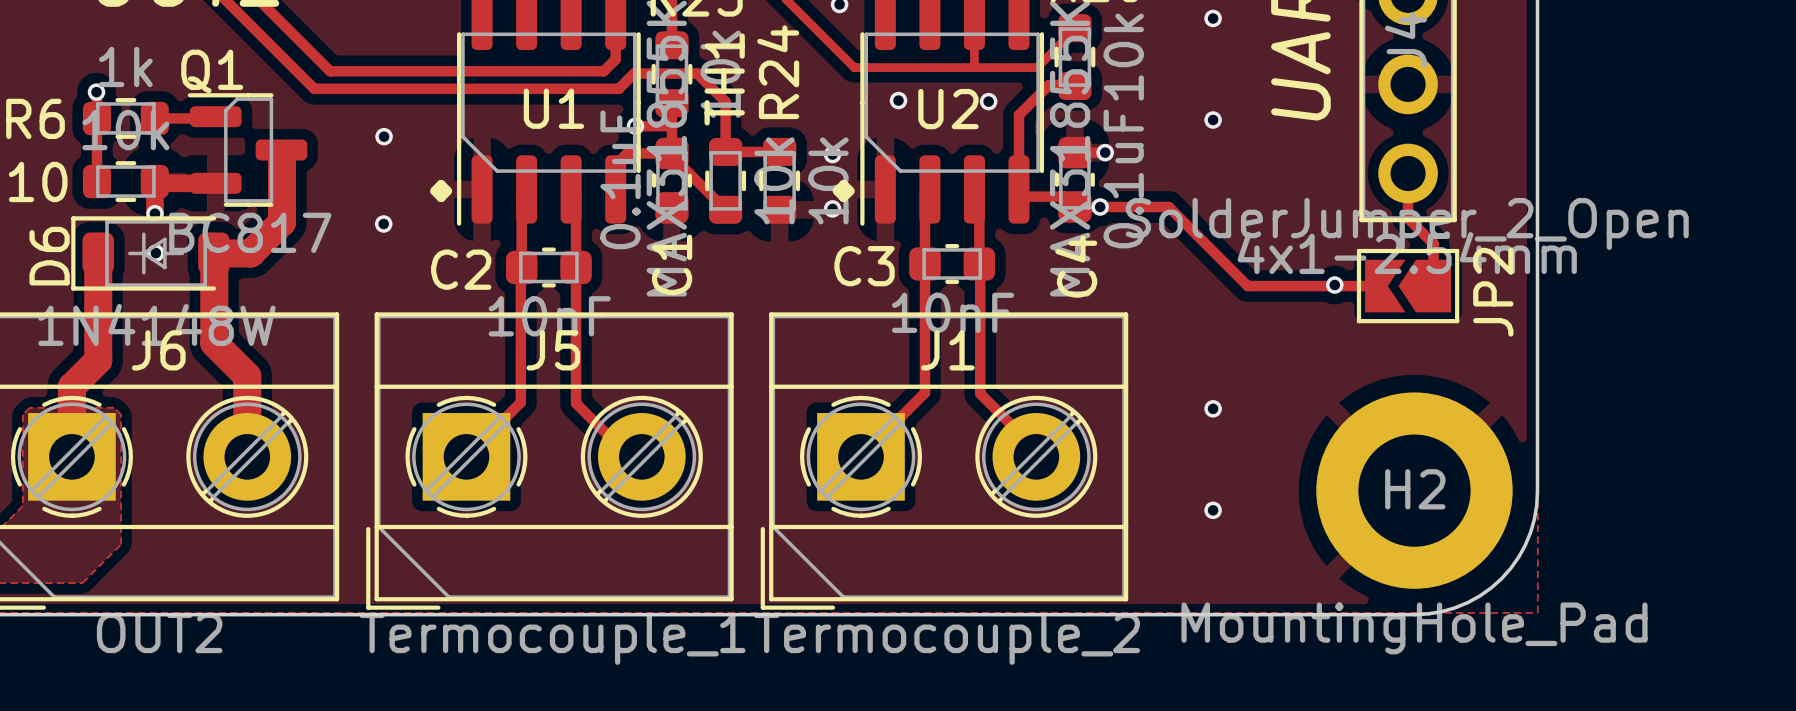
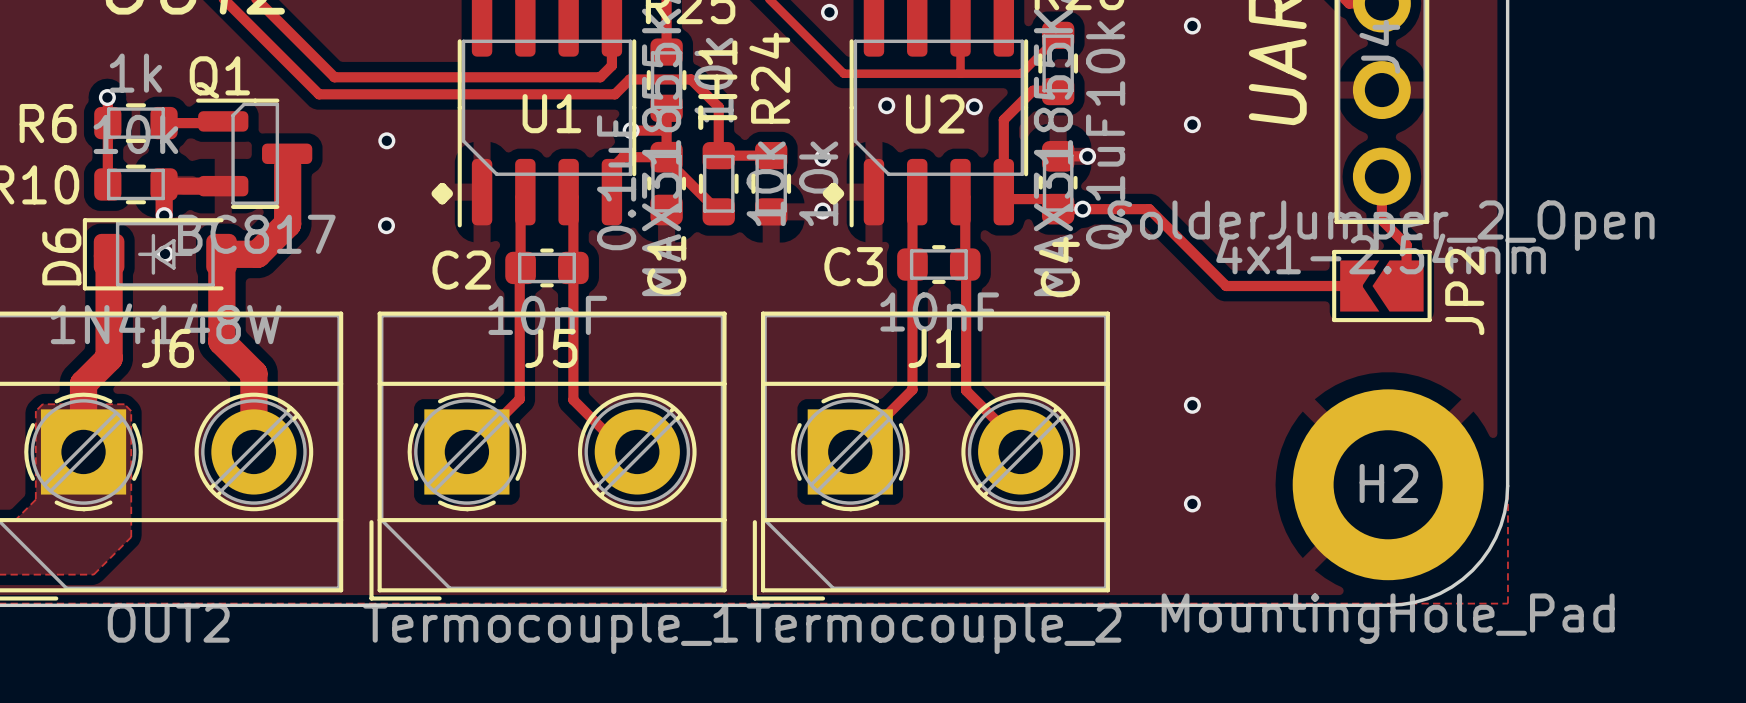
via: (1334, 285) -> none

